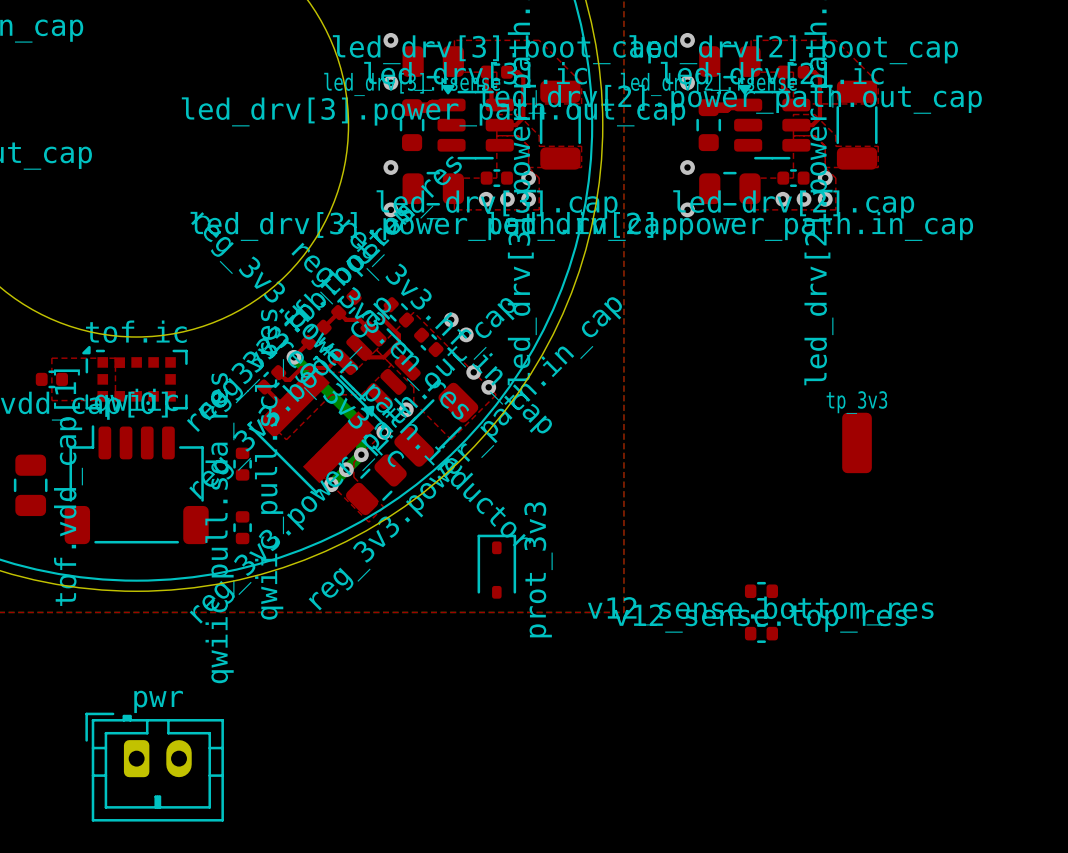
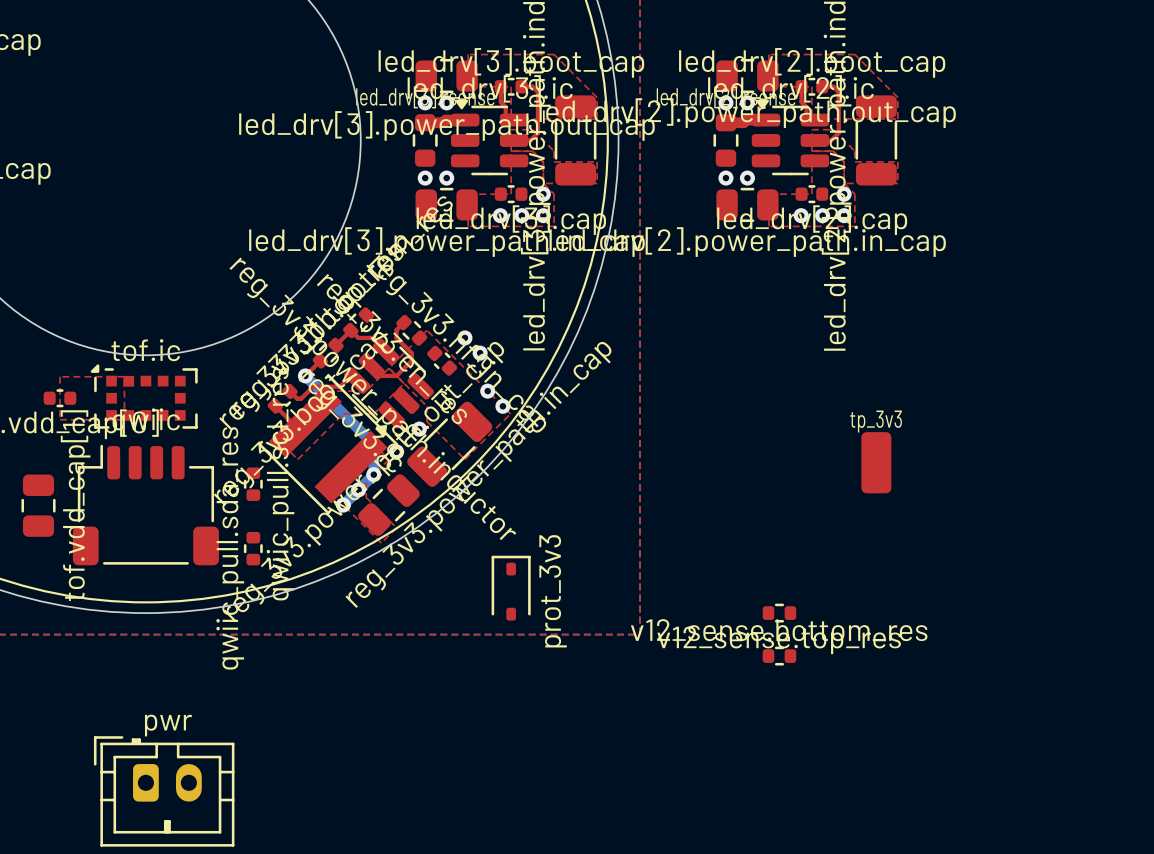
via: (390, 40) -> none
via: (687, 40) -> none
via: (390, 82) -> none
via: (687, 82) -> none
via: none -> (425, 102)
via: none -> (446, 102)
via: none -> (725, 102)
via: none -> (747, 102)
via: none -> (425, 178)
via: none -> (446, 178)
via: none -> (725, 178)
via: none -> (747, 178)
via: (390, 167) -> none
via: (687, 167) -> none
via: (390, 209) -> none
via: (687, 209) -> none

